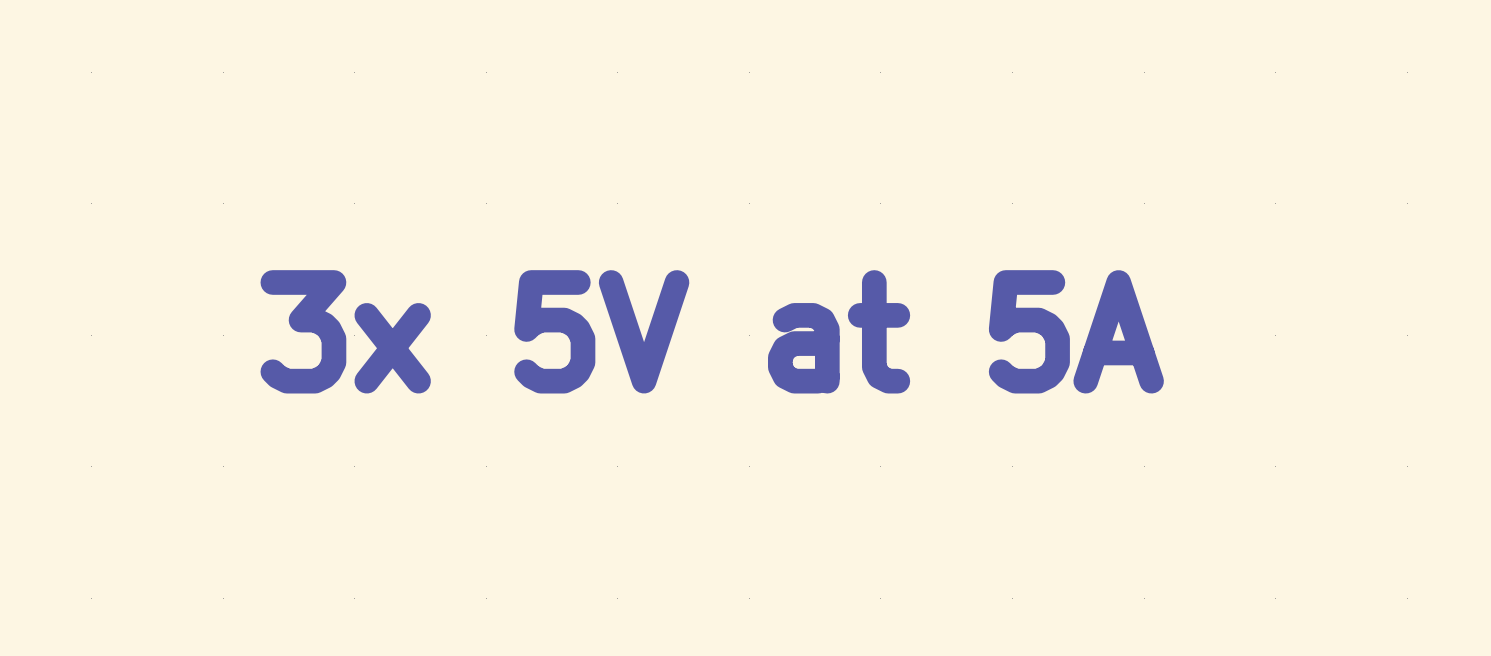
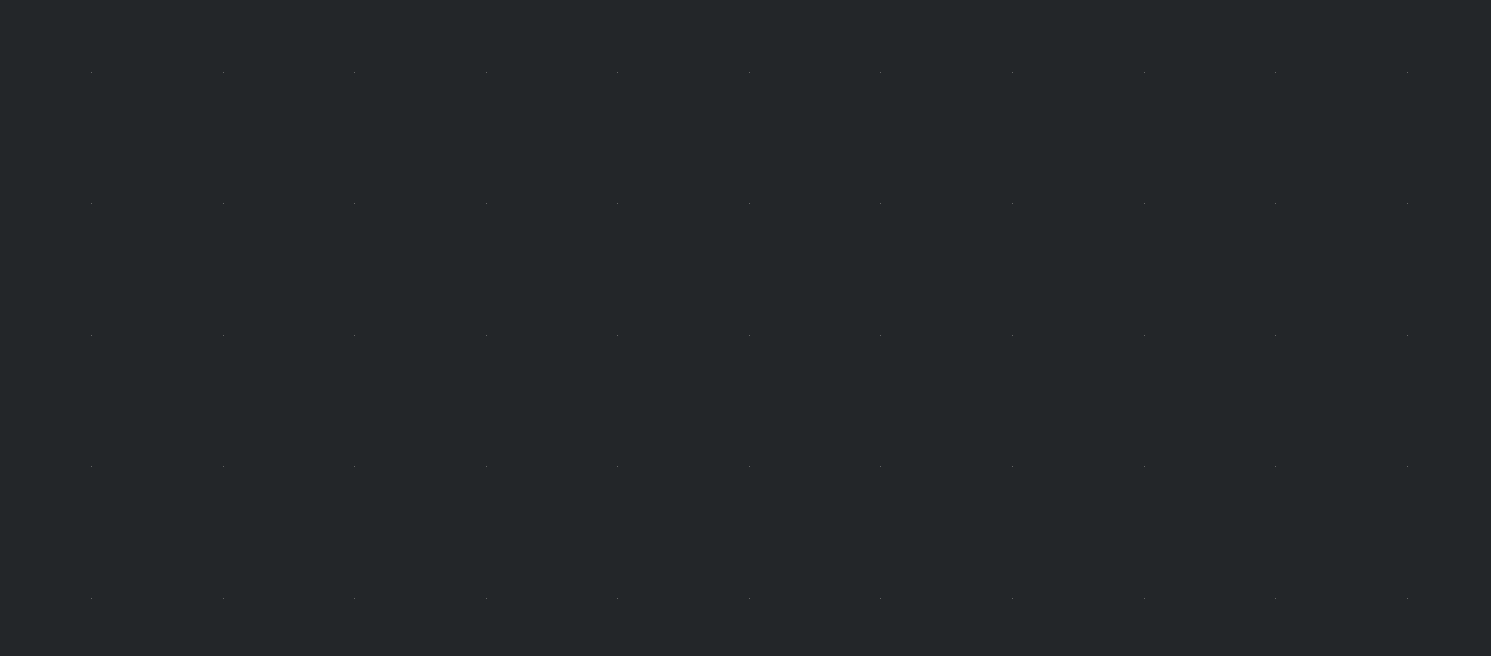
text: 3x 5V at 5A (712, 331) -> none

